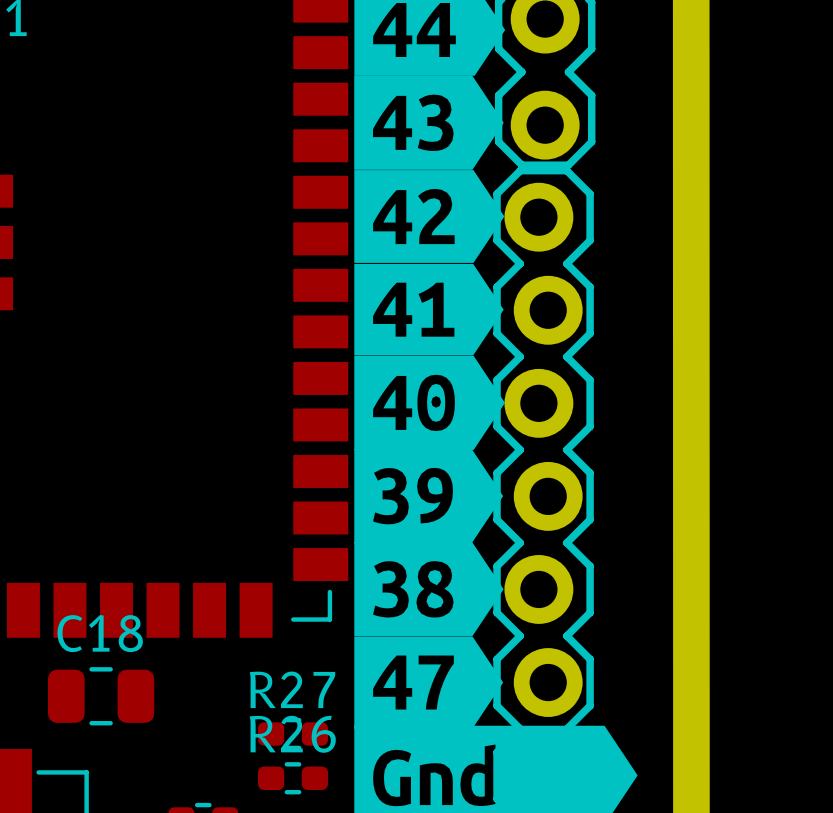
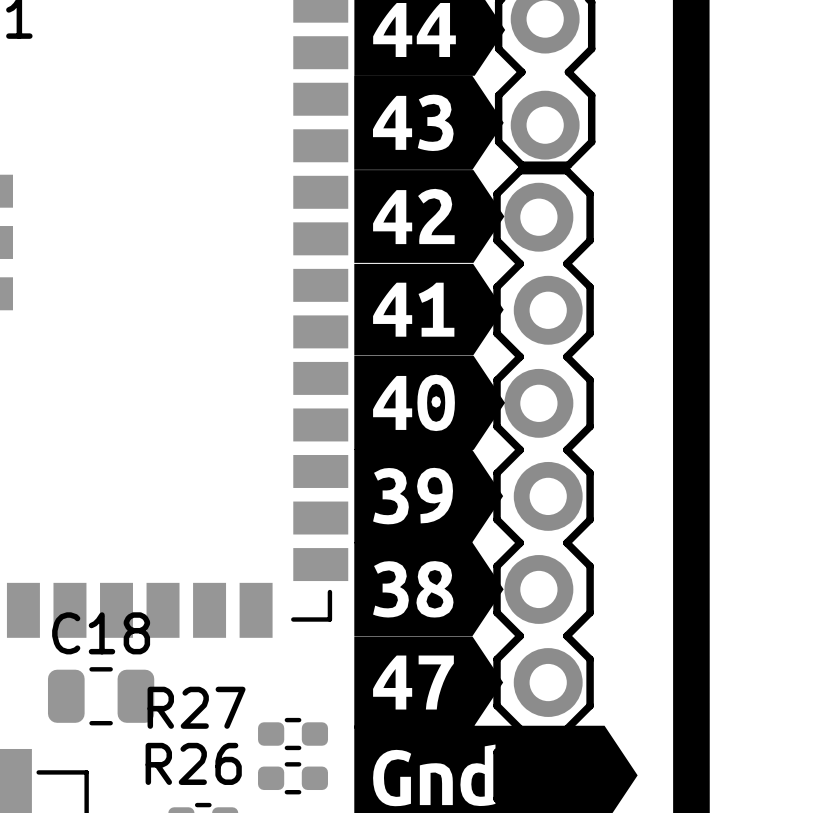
R27 name position: R27 (292, 689) -> R27 (196, 707)
R26 name position: R26 (292, 734) -> R26 (193, 763)

